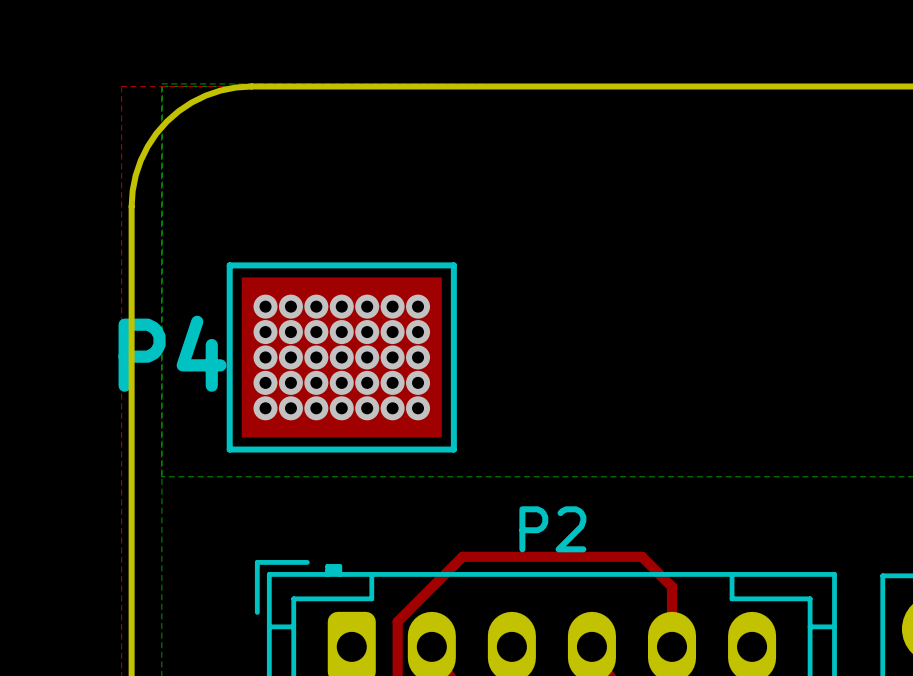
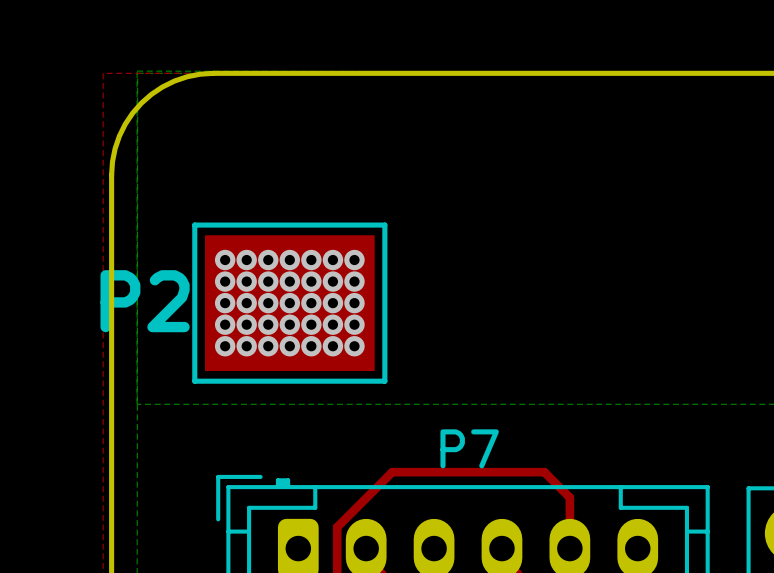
P4 name: P4 (172, 353) -> P2 (145, 301)
P2 name: P2 (552, 529) -> P7 (469, 448)

